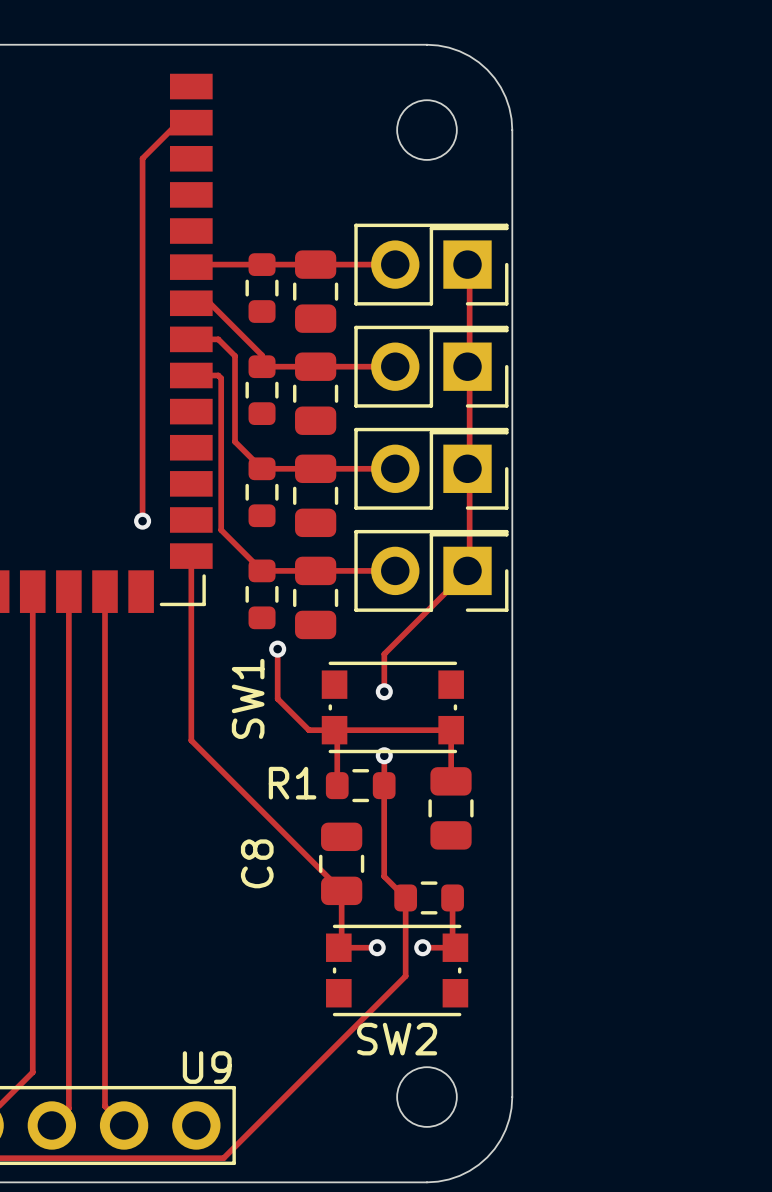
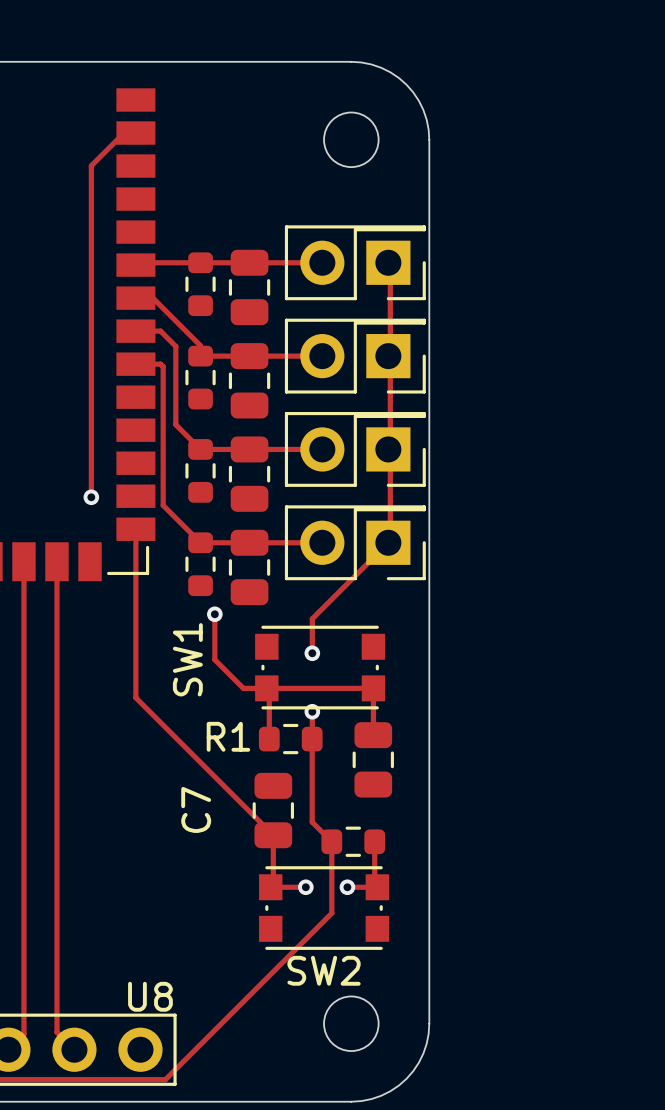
C8 name: C8 (257, 863) -> C7 (196, 809)
U9 name: U9 (207, 1067) -> U8 (150, 996)

